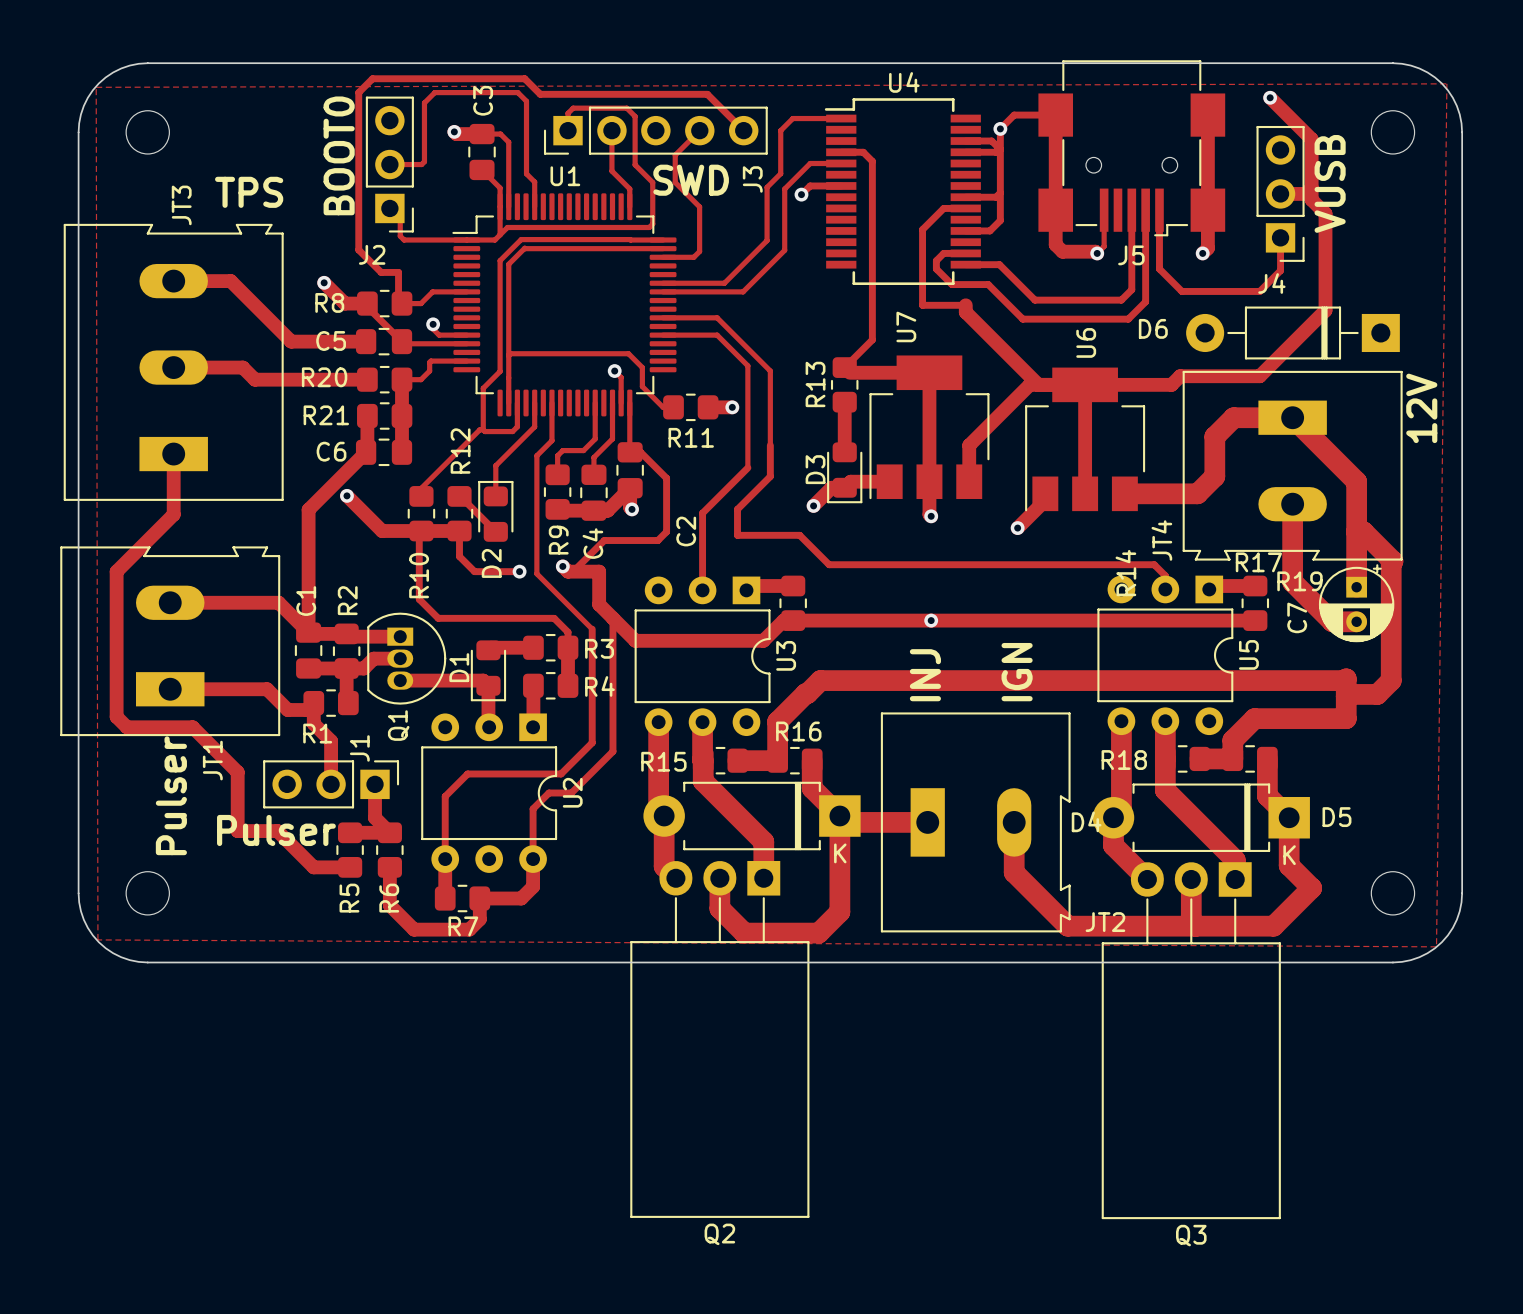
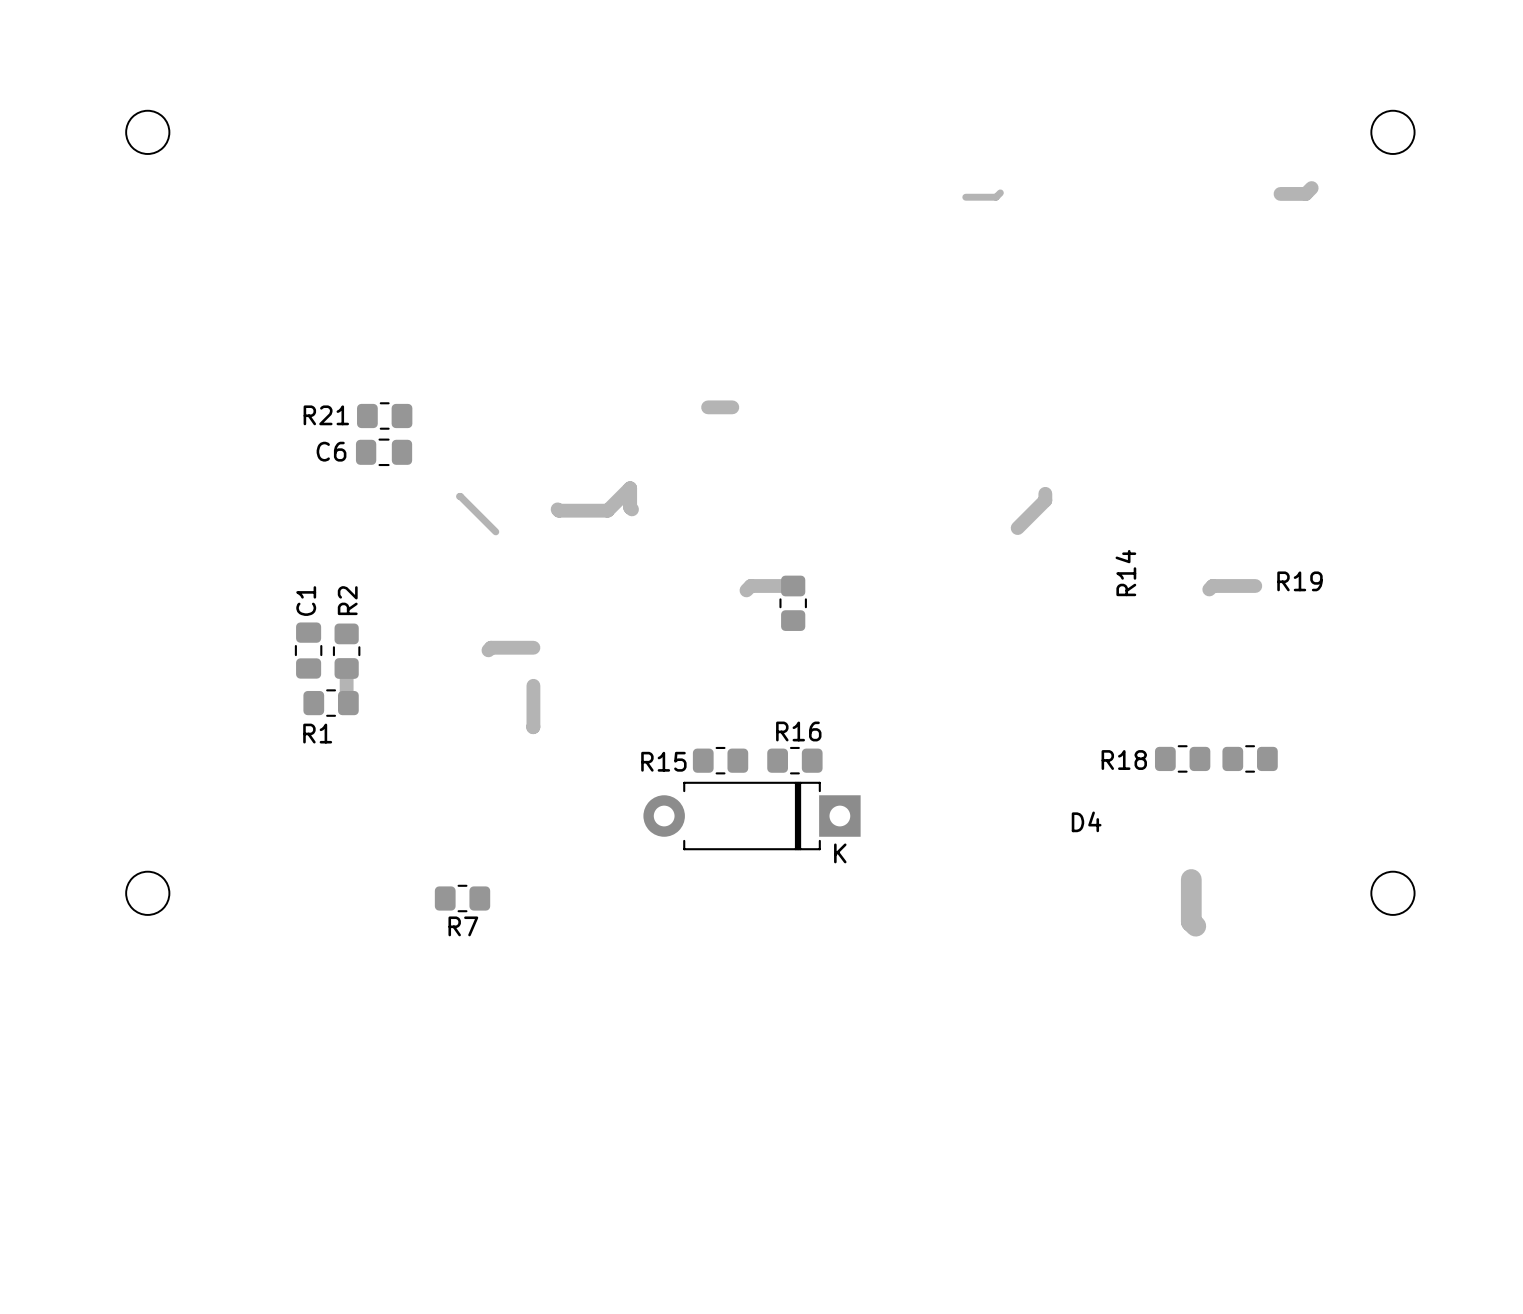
board edge: (147, 63) (1392, 63) (1410, 65) (1427, 72) (1441, 83) (1452, 97) (1459, 114) (1462, 132) (1462, 893) (1459, 911) (1452, 927) (1441, 942) (1427, 953) (1410, 960) (1392, 962) (147, 962) (129, 960) (113, 953) (98, 942) (87, 927) (80, 911) (78, 893) (78, 132) (83, 105) (98, 83) (121, 68) (147, 63) -> none
zone outline: (1446, 83) (96, 87) (97, 939) (1436, 946) (1446, 83) -> none
track: (1270, 97) (1311, 139) (1311, 199) (1325, 213) (1325, 310) (1259, 376) (1180, 376) (1171, 384) (1029, 384) (969, 445) (969, 481) -> none
via: (1270, 97) -> none
track: (1207, 115) (1207, 248) (1202, 253) -> none
track: (841, 118) (792, 118) (780, 130) (780, 173) (767, 187) (767, 240) (724, 283) (663, 283) -> none
via: (1000, 128) -> none
track: (568, 130) (568, 113) (573, 108) (626, 108) (635, 116) (635, 164) (652, 182) (652, 224) (649, 227) (507, 227) (494, 240) (404, 240) (400, 236) (400, 218) (389, 208) -> none
track: (611, 130) (611, 171) (629, 188) (629, 206) -> none
J3: (655, 130) -> none
track: (699, 130) (675, 155) (675, 182) (699, 206) (699, 251) (693, 257) (663, 257) -> none
track: (743, 130) (707, 94) (540, 94) (524, 78) (372, 78) (358, 92) (358, 249) (381, 272) (398, 272) (398, 300) (401, 303) (421, 303) (432, 291) (466, 291) -> none
track: (454, 131) (456, 134) (500, 134) (508, 142) (508, 206) -> none
via: (454, 131) -> none
track: (965, 141) (991, 141) (1000, 149) (996, 152) (965, 152) -> none
J5: (1131, 148) -> none
C3: (482, 152) -> none
track: (841, 152) (863, 152) (872, 161) (872, 339) (844, 367) -> none
text: BOOT0 (339, 155) -> none
track: (841, 163) (810, 163) (784, 189) (784, 250) (743, 291) (663, 291) -> none
track: (389, 164) (421, 164) (424, 161) (424, 102) (434, 92) (517, 92) (526, 101) (526, 173) (534, 182) (534, 206) -> none
J2: (389, 164) -> none
track: (482, 169) (500, 188) (500, 234) -> none
text: SWD (691, 180) -> none
text: VUSB (1330, 183) -> none
track: (841, 185) (810, 185) (801, 194) -> none
U4: (902, 191) -> none
text: TPS (249, 192) -> none
J4: (1280, 193) -> none
via: (801, 194) -> none
track: (965, 208) (943, 208) (922, 229) (922, 305) (965, 305) (965, 312) (1038, 384) -> none
track: (1104, 210) (1104, 246) (1097, 253) (1095, 251) (1062, 251) (1055, 244) (1055, 115) (1014, 115) (1000, 128) (1000, 220) (989, 230) (965, 230) -> none
track: (1131, 210) (1131, 289) (1121, 300) (1034, 300) (999, 264) (965, 264) -> none
track: (1145, 210) (1145, 301) (1128, 319) (1022, 319) (988, 284) (951, 284) (936, 268) (936, 260) (943, 253) (965, 253) -> none
track: (1159, 210) (1159, 268) (1181, 291) (1259, 291) (1280, 270) (1280, 237) -> none
track: (663, 240) (521, 239) (500, 260) (500, 371) (483, 388) (483, 429) -> none
track: (663, 248) (524, 248) (508, 264) (508, 403) -> none
via: (1097, 253) -> none
via: (1202, 253) -> none
track: (173, 281) (230, 281) (291, 341) (366, 341) -> none
track: (324, 282) (344, 303) (367, 303) (367, 307) (404, 343) (466, 343) -> none
via: (324, 282) -> none
R8: (384, 303) -> none
U1: (564, 304) -> none
track: (663, 317) (717, 317) (770, 371) (770, 476) (737, 509) (737, 535) (799, 535) (829, 564) (1154, 564) (1165, 575) (1165, 589) -> none
track: (433, 324) (433, 329) (439, 335) (466, 335) -> none
via: (433, 324) -> none
D6: (1292, 332) -> none
track: (663, 335) (717, 335) (747, 365) (747, 467) (702, 513) (702, 590) -> none
C5: (384, 341) -> none
track: (508, 355) (510, 353) (628, 353) (642, 367) (642, 386) (663, 407) (673, 407) -> none
track: (466, 361) (430, 361) (429, 371) (421, 379) (401, 379) (401, 452) -> none
JT3: (173, 362) -> none
track: (173, 367) (242, 367) (254, 379) (367, 379) -> none
track: (614, 371) (621, 377) (621, 403) -> none
via: (614, 371) -> none
track: (849, 372) (929, 372) (929, 514) (931, 516) -> none
R20: (384, 379) -> none
R13: (844, 384) -> none
track: (1085, 384) (1085, 493) -> none
track: (844, 402) (844, 452) -> none
track: (517, 403) (517, 426) (512, 431) (485, 431) (483, 429) -> none
track: (534, 403) (534, 426) (495, 465) (495, 496) -> none
track: (551, 403) (551, 440) (536, 455) (536, 573) (592, 629) (592, 742) (561, 773) (467, 773) (445, 796) (445, 898) -> none
track: (595, 403) (595, 438) (583, 450) (562, 450) (557, 455) (557, 474) -> none
track: (612, 403) (612, 438) (593, 457) (593, 474) -> none
track: (629, 403) (629, 451) (640, 452) (666, 478) (666, 531) (657, 540) (604, 540) (574, 569) (566, 569) (562, 566) (568, 571) (599, 571) (599, 604) (635, 640) (763, 640) (783, 620) (1255, 620) -> none
R11: (690, 407) -> none
via: (732, 407) -> none
text: 12V (1421, 408) -> none
track: (367, 415) (367, 451) (308, 509) (308, 632) -> none
U7: (929, 427) -> none
track: (483, 429) (479, 429) (421, 488) (421, 496) -> none
U6: (1085, 439) -> none
track: (173, 454) (173, 514) (116, 571) (116, 716) (127, 727) (192, 727) (237, 772) (237, 831) (277, 831) (313, 867) (350, 867) -> none
JT4: (1292, 465) -> none
C2: (630, 470) -> none
D3: (844, 472) -> none
track: (889, 481) (850, 481) (844, 487) (831, 487) (813, 505) -> none
R9: (557, 492) -> none
C4: (593, 492) -> none
track: (1124, 493) (1197, 493) (1214, 476) (1214, 436) (1233, 417) (1292, 417) (1356, 481) (1356, 587) -> none
track: (346, 495) (382, 531) (459, 531) (459, 556) (474, 571) (519, 571) -> none
via: (346, 495) -> none
track: (1292, 504) (1292, 582) (1332, 621) (1356, 621) -> none
via: (813, 505) -> none
via: (632, 509) -> none
D2: (495, 511) -> none
R10: (421, 513) -> none
R12: (459, 513) -> none
via: (931, 516) -> none
via: (1017, 528) -> none
track: (421, 531) (419, 533) (419, 599) (438, 618) (554, 618) (568, 632) (568, 685) -> none
track: (1356, 531) (1363, 531) (1392, 561) (1391, 562) (1391, 680) (1377, 694) (1347, 694) (1346, 696) -> none
via: (562, 566) -> none
via: (519, 571) -> none
track: (170, 602) (278, 602) (309, 633) (346, 633) (349, 636) (400, 636) -> none
R17: (1255, 603) -> none
C7: (1356, 603) -> none
track: (612, 618) (612, 751) (571, 793) (548, 793) (533, 808) (533, 886) (521, 898) (479, 898) (479, 919) (469, 929) (414, 929) (389, 905) (389, 867) -> none
via: (931, 620) -> none
JT1: (170, 641) -> none
R3: (550, 647) -> none
U5: (1165, 655) -> none
U3: (702, 656) -> none
track: (400, 658) (373, 658) (363, 668) (308, 668) -> none
Q1: (406, 658) -> none
D1: (488, 670) -> none
text: IGN (1017, 672) -> none
text: INJ (925, 675) -> none
track: (400, 680) (483, 680) (488, 685) (489, 727) -> none
R4: (550, 685) -> none
track: (170, 689) (267, 689) (287, 710) (306, 710) (313, 703) (313, 723) (331, 741) (331, 784) -> none
track: (1121, 721) (1121, 809) (1113, 817) (1113, 845) (1147, 879) -> none
track: (1165, 721) (1165, 790) (1235, 860) (1235, 879) -> none
track: (658, 722) (658, 810) (664, 816) (664, 866) (675, 878) -> none
track: (702, 722) (703, 781) (763, 841) (763, 878) -> none
track: (1199, 758) (1232, 758) (1232, 740) (1254, 718) (1346, 718) (1346, 678) (1344, 680) (820, 680) (777, 721) (777, 760) (737, 760) -> none
track: (1267, 758) (1267, 795) (1289, 817) (1289, 865) (1311, 888) (1273, 926) (1067, 926) (1014, 872) (1014, 822) -> none
track: (812, 760) (812, 788) (846, 822) (927, 822) -> none
J1: (331, 784) -> none
track: (375, 784) (375, 817) (389, 832) (350, 832) -> none
U2: (489, 793) -> none
text: Pulser (171, 795) -> none
track: (839, 816) (839, 911) (818, 933) (744, 933) (719, 908) (719, 878) -> none
D5: (1201, 817) -> none
JT2: (975, 822) -> none
text: Pulser (276, 830) -> none
R5: (350, 850) -> none
R6: (389, 850) -> none
Q2: (719, 1039) -> none
Q3: (1191, 1040) -> none

